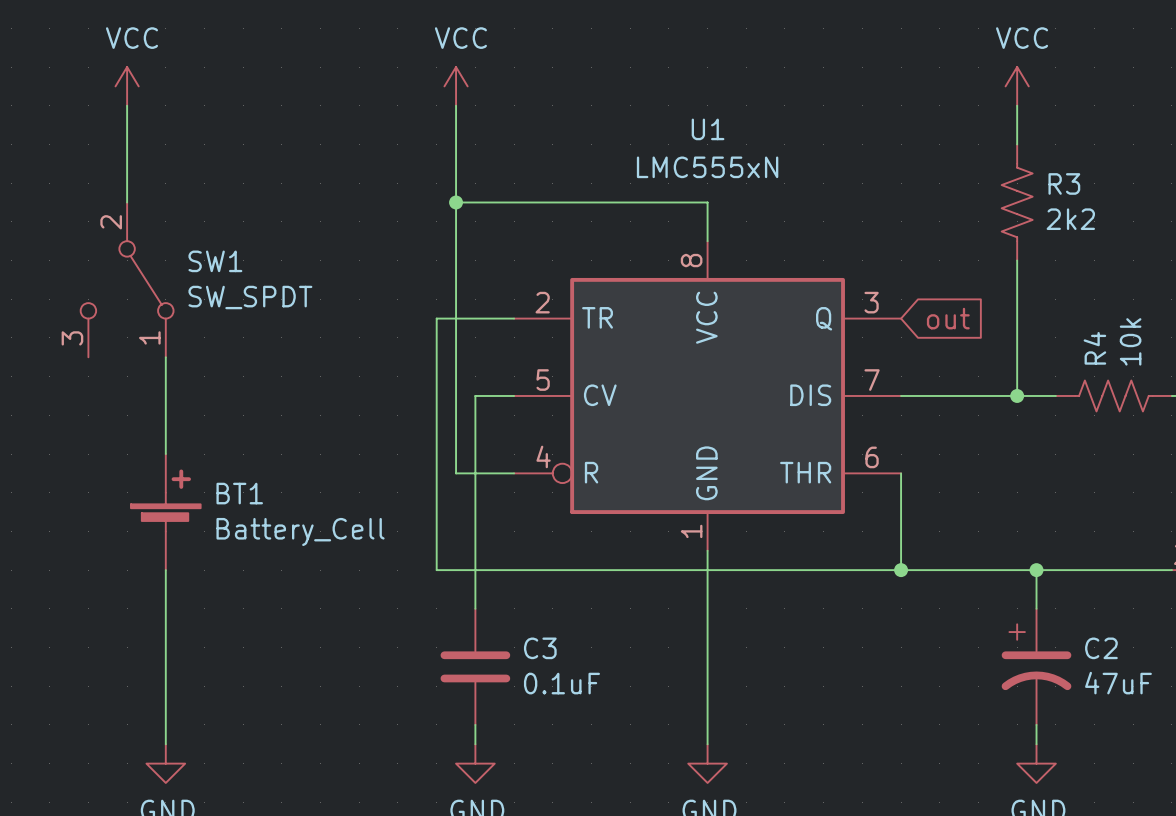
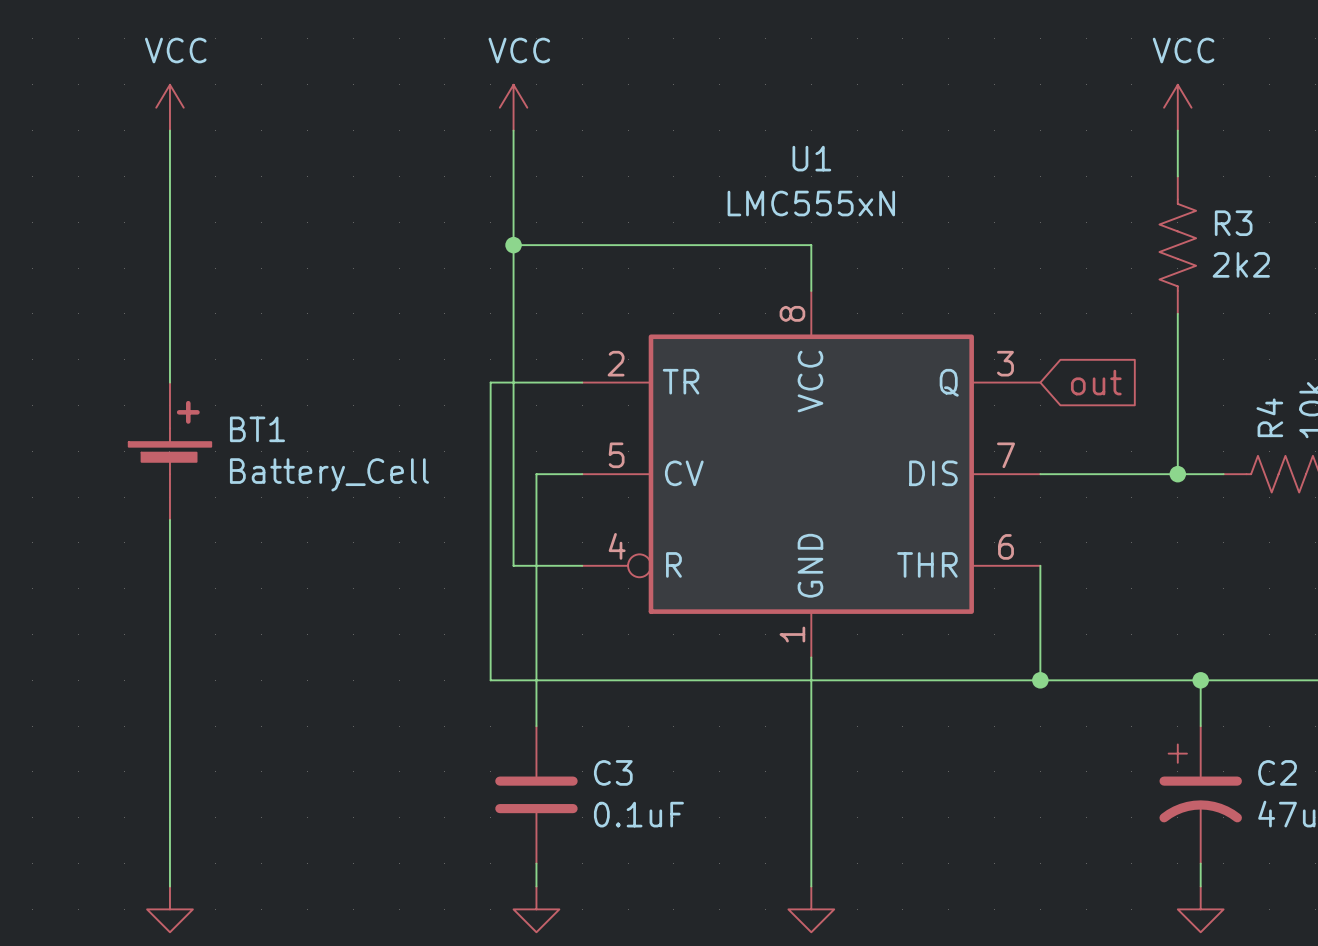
power symbol position: VCC (127, 86) -> VCC (169, 107)
wire: (127, 105) (127, 202) -> none
wire: none -> (169, 130) (169, 382)
SW1: SW_SPDT (127, 279) -> none
BT1 position: (165, 512) -> (169, 451)

